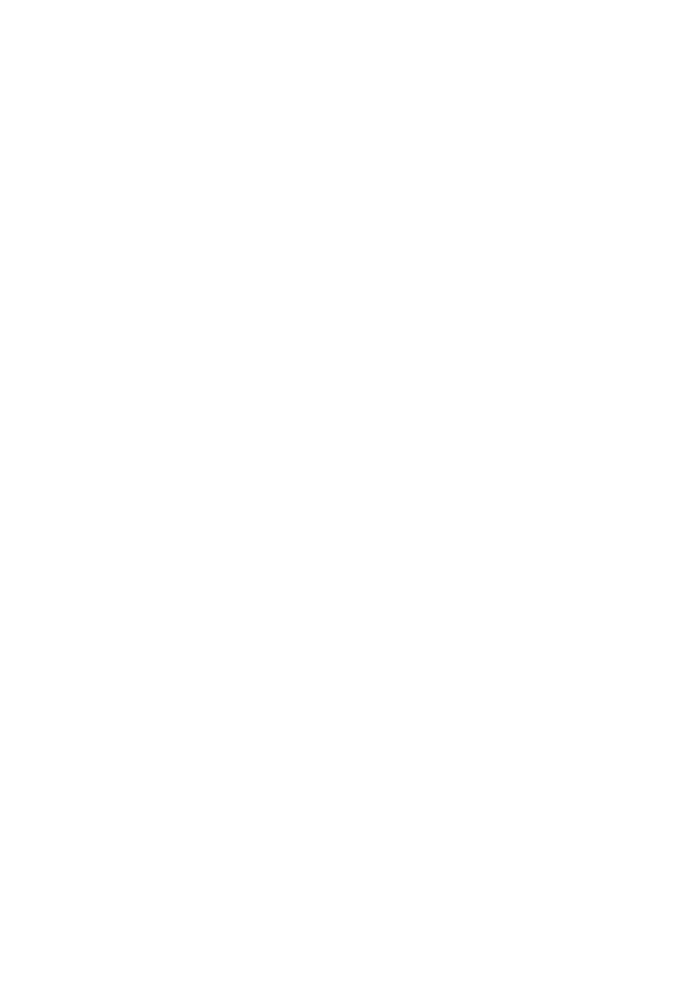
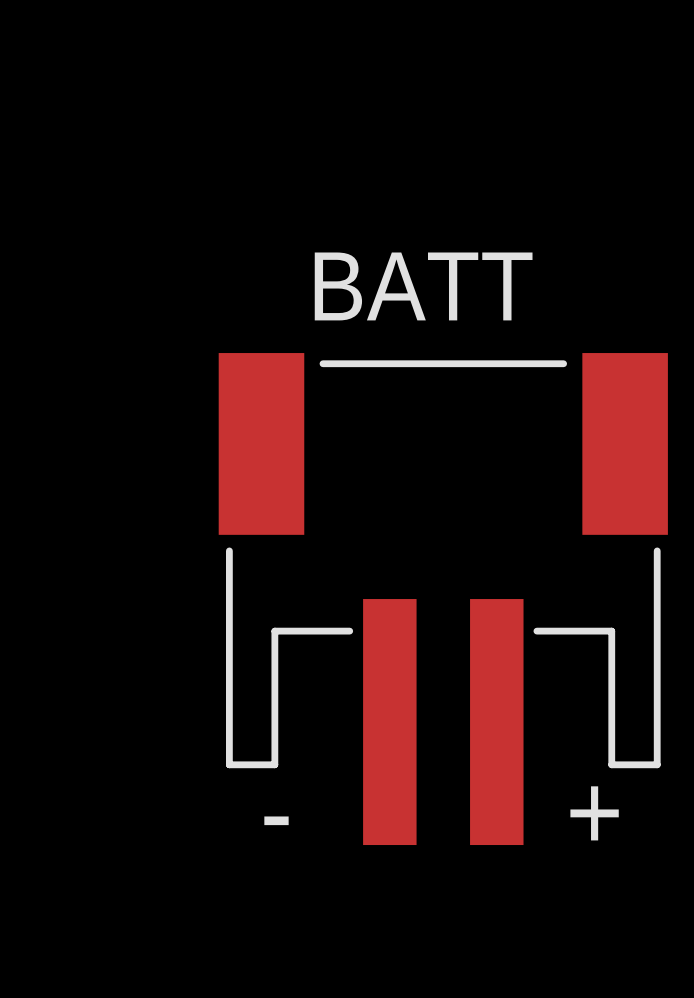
BATT: none -> (443, 599)

